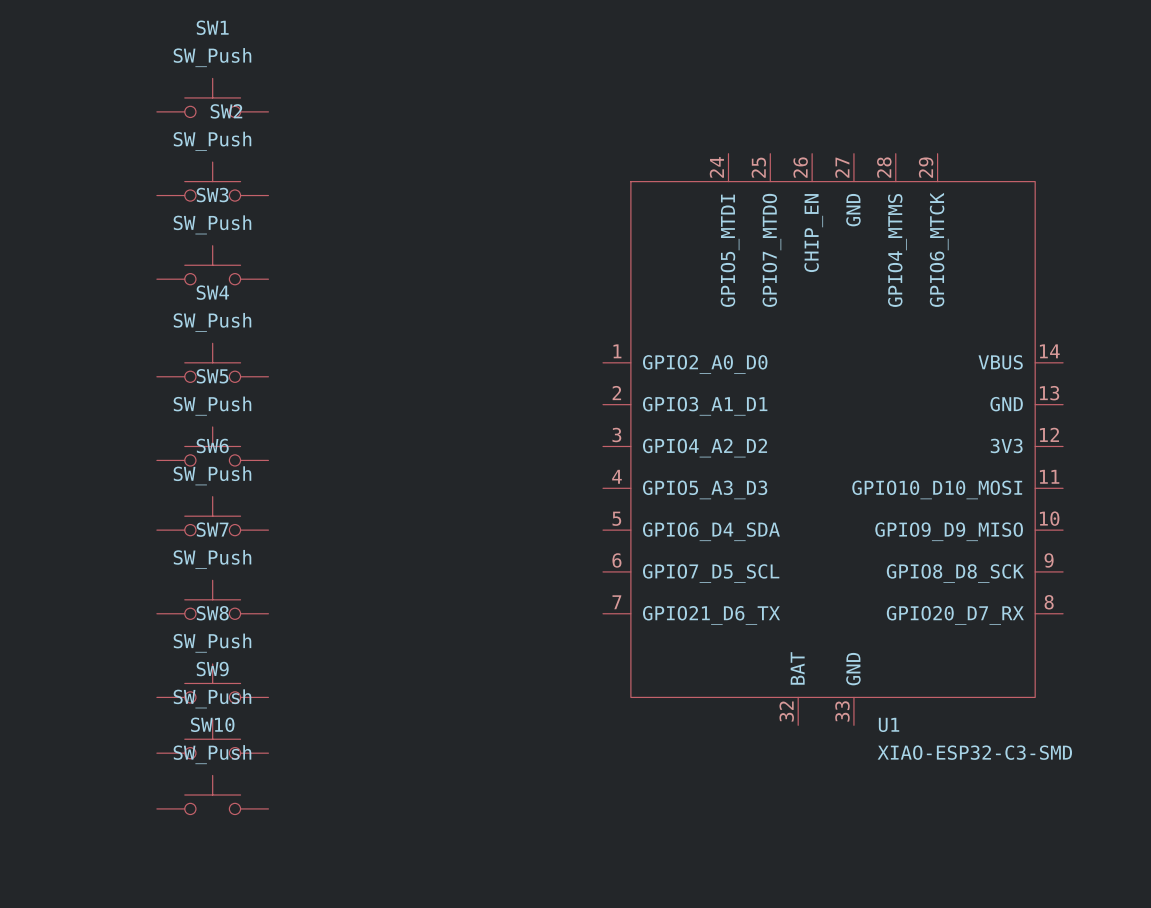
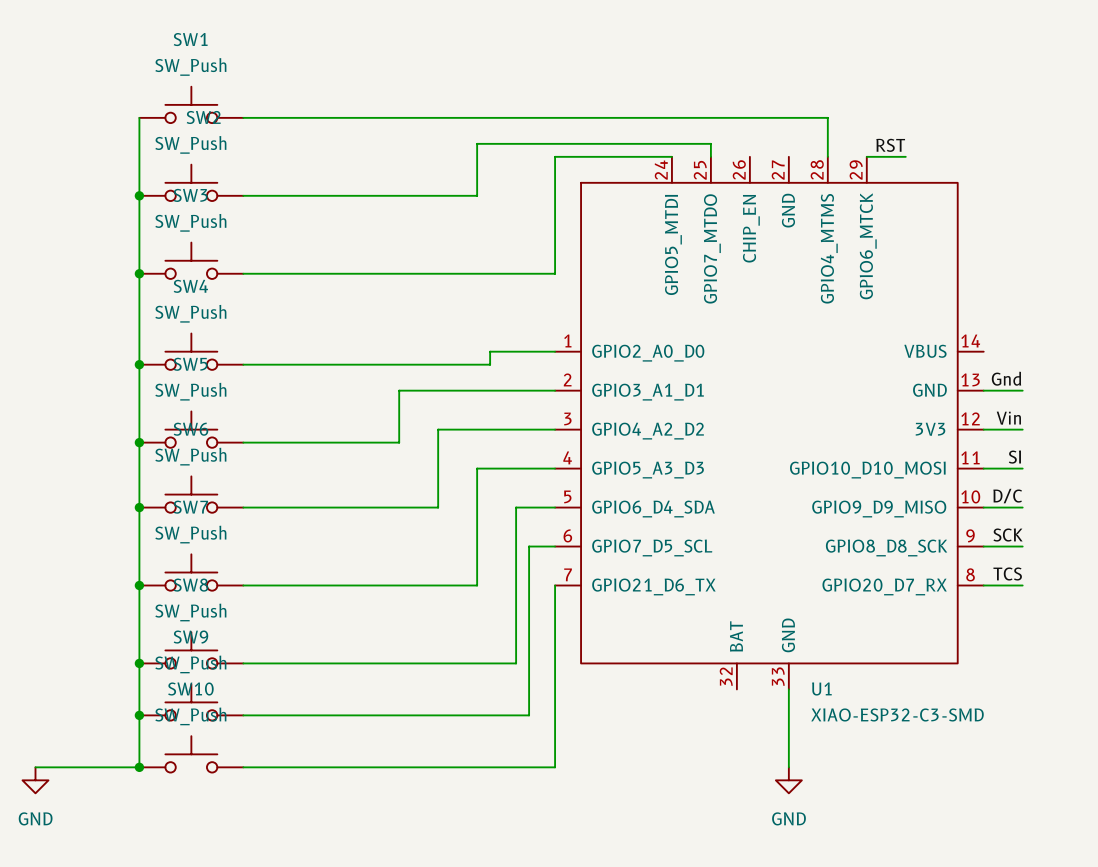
wire: none -> (139, 117) (139, 767) (35, 767)
wire: none -> (243, 117) (827, 117) (827, 156)
label: none -> RST (890, 145)
wire: none -> (671, 156) (555, 156) (555, 273) (243, 273)
wire: none -> (710, 156) (710, 143) (477, 143) (477, 195) (243, 195)
wire: none -> (866, 156) (905, 156)
junction: none -> (139, 195)
junction: none -> (139, 273)
wire: none -> (555, 351) (490, 351) (490, 364) (243, 364)
junction: none -> (139, 364)
label: none -> Gnd (1006, 378)
wire: none -> (555, 390) (399, 390) (399, 442) (243, 442)
wire: none -> (983, 390) (1022, 390)
label: none -> Vin (1008, 418)
wire: none -> (555, 429) (438, 429) (438, 507) (243, 507)
wire: none -> (983, 429) (1022, 429)
junction: none -> (139, 442)
label: none -> SI (1014, 457)
wire: none -> (555, 468) (477, 468) (477, 585) (243, 585)
wire: none -> (983, 468) (1022, 468)
label: none -> D/C (1007, 496)
junction: none -> (139, 507)
wire: none -> (555, 507) (516, 507) (516, 663) (243, 663)
wire: none -> (983, 507) (1022, 507)
label: none -> SCK (1008, 535)
wire: none -> (555, 546) (529, 546) (529, 715) (243, 715)
wire: none -> (983, 546) (1022, 546)
label: none -> TCS (1007, 573)
junction: none -> (139, 585)
wire: none -> (555, 585) (555, 767) (243, 767)
wire: none -> (983, 585) (1022, 585)
junction: none -> (139, 663)
wire: none -> (788, 689) (788, 767)
junction: none -> (139, 715)
junction: none -> (139, 767)
power symbol: none -> GND (35, 780)
power symbol: none -> GND (788, 780)

